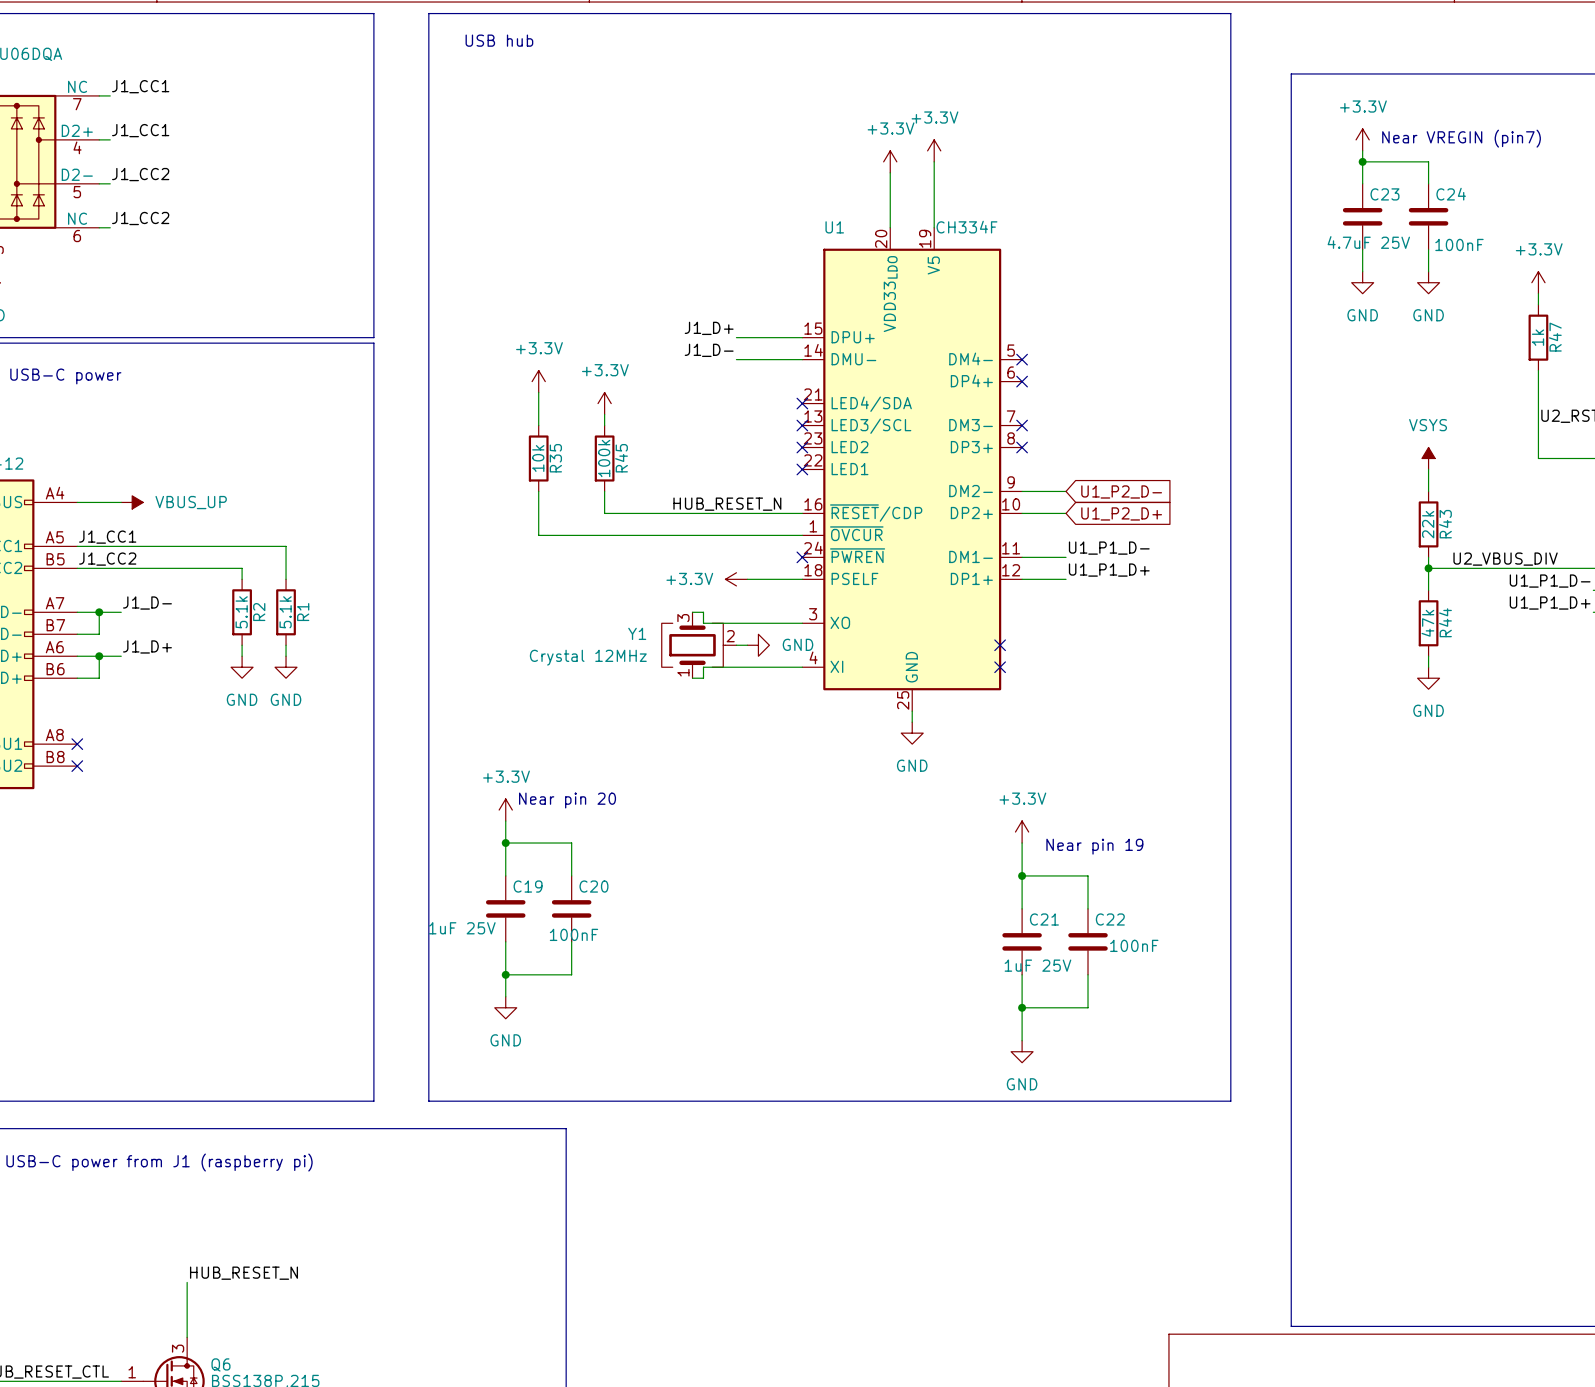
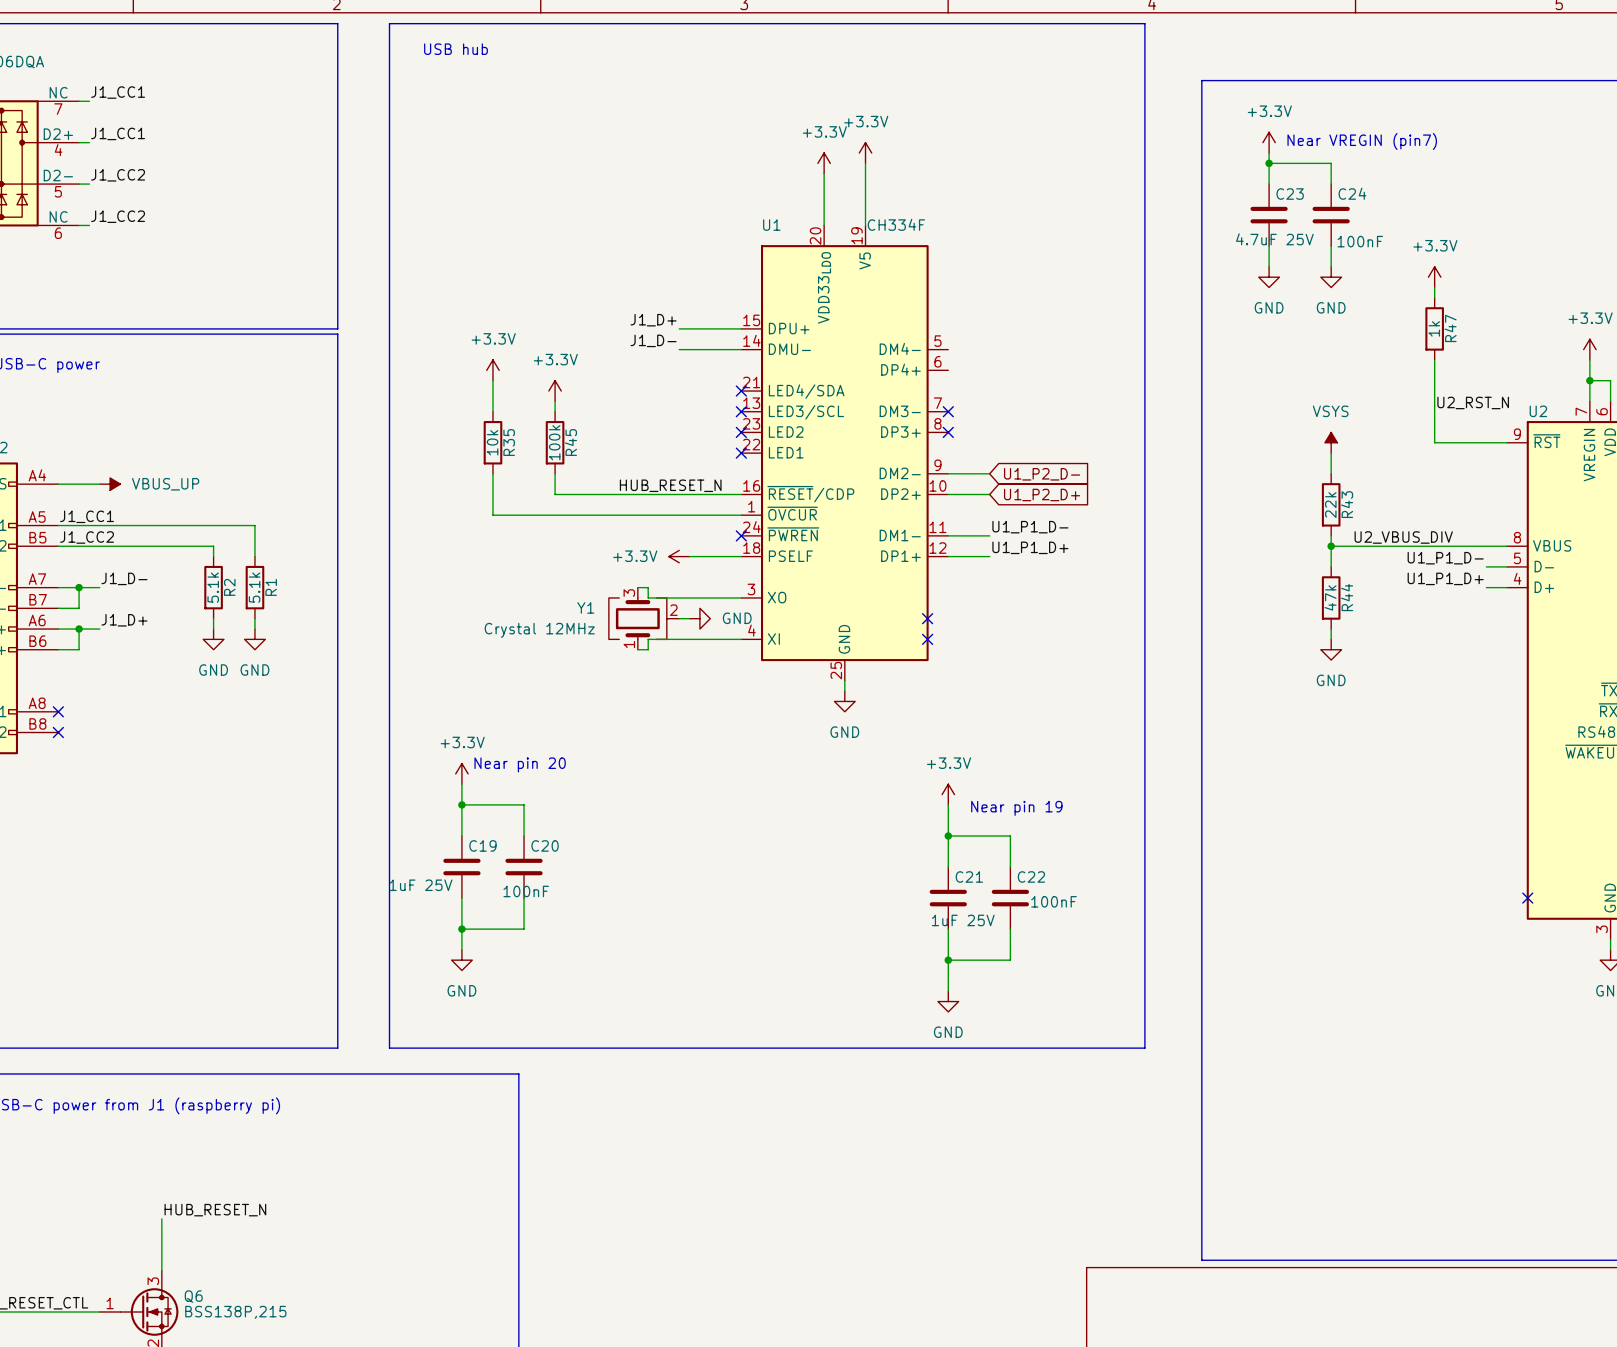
no-connect mark: (1022, 359) -> none
no-connect mark: (1022, 381) -> none

